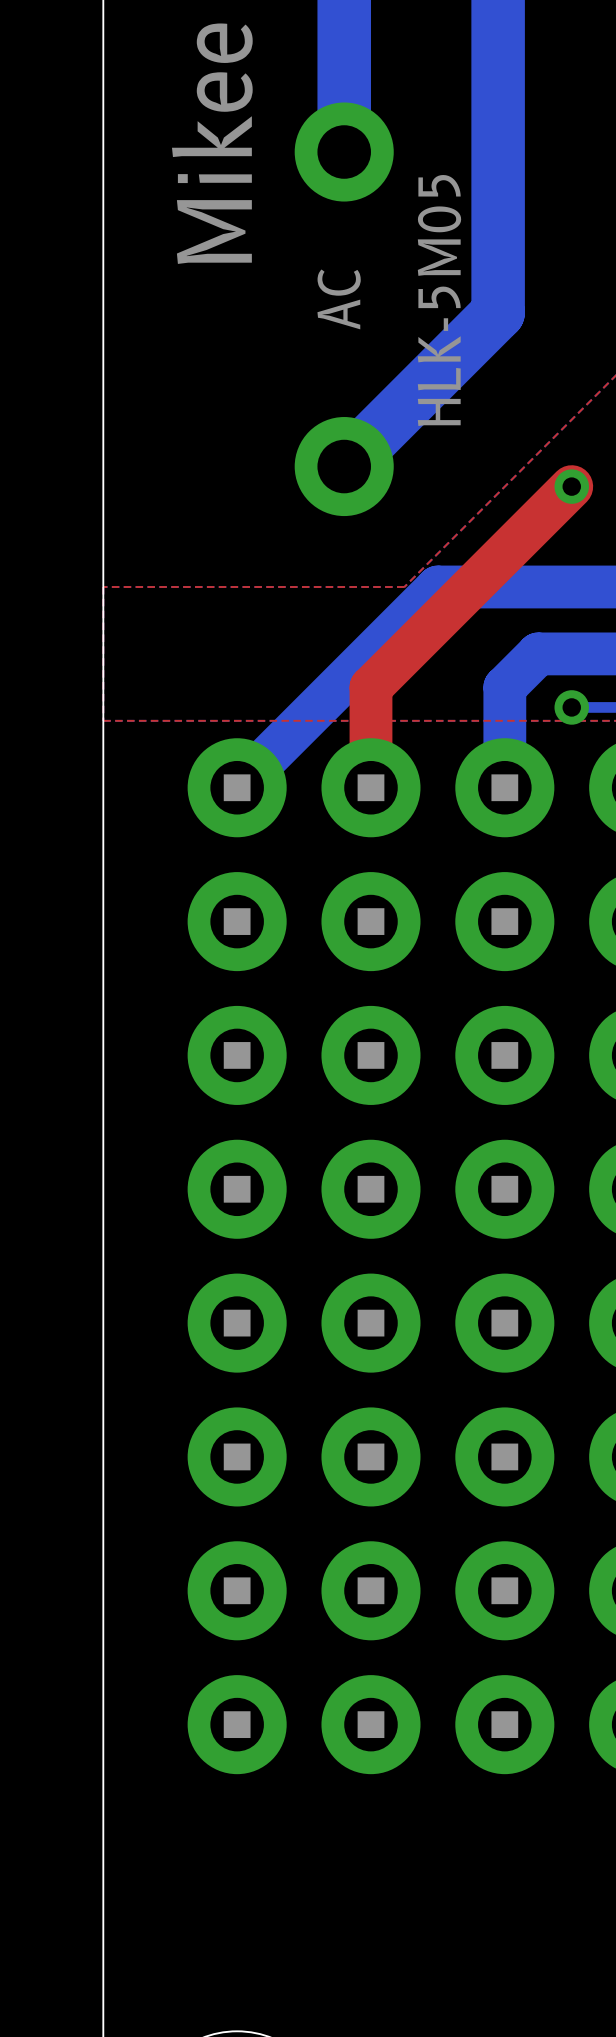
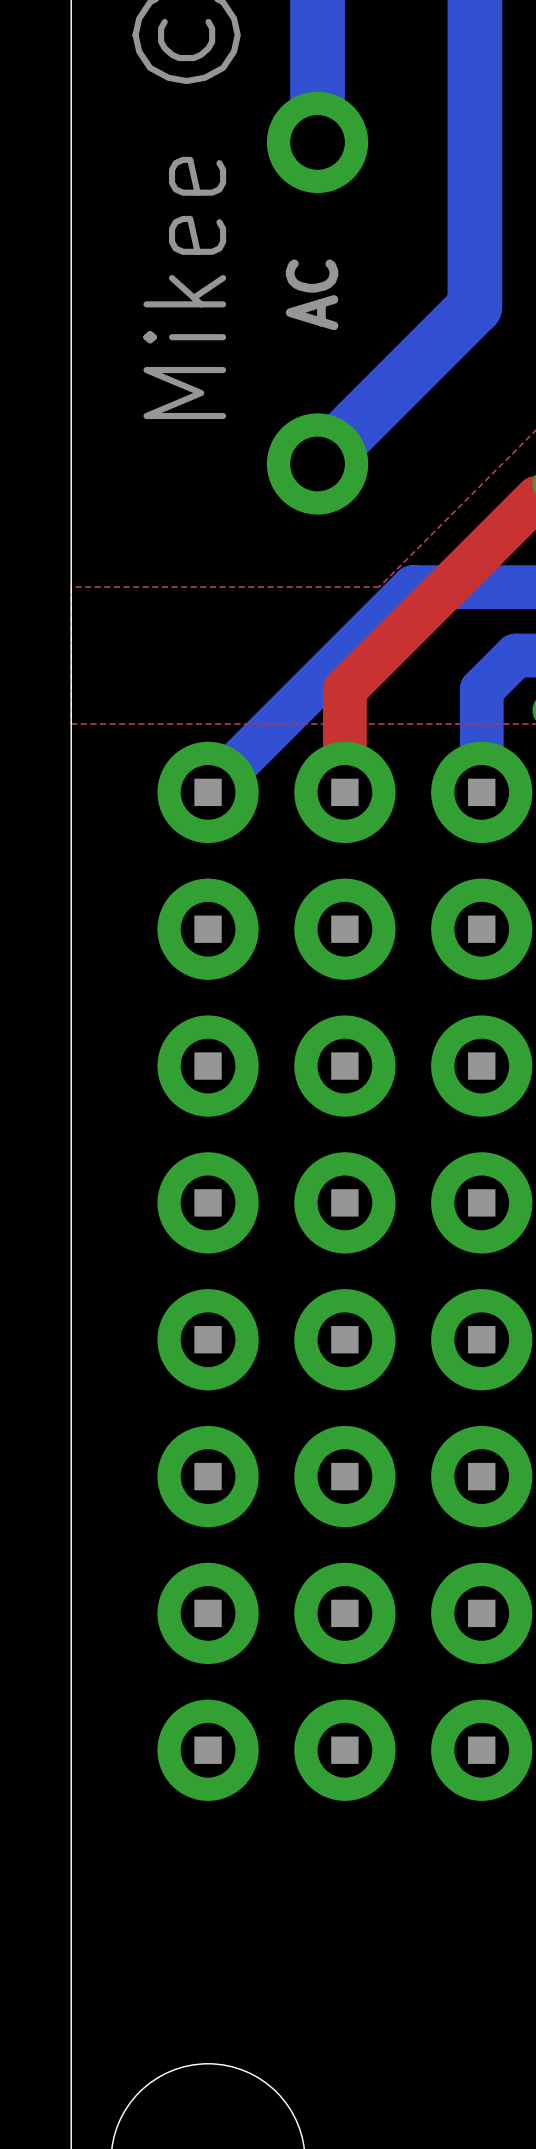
text: HLK-5M05 (439, 300) -> none

